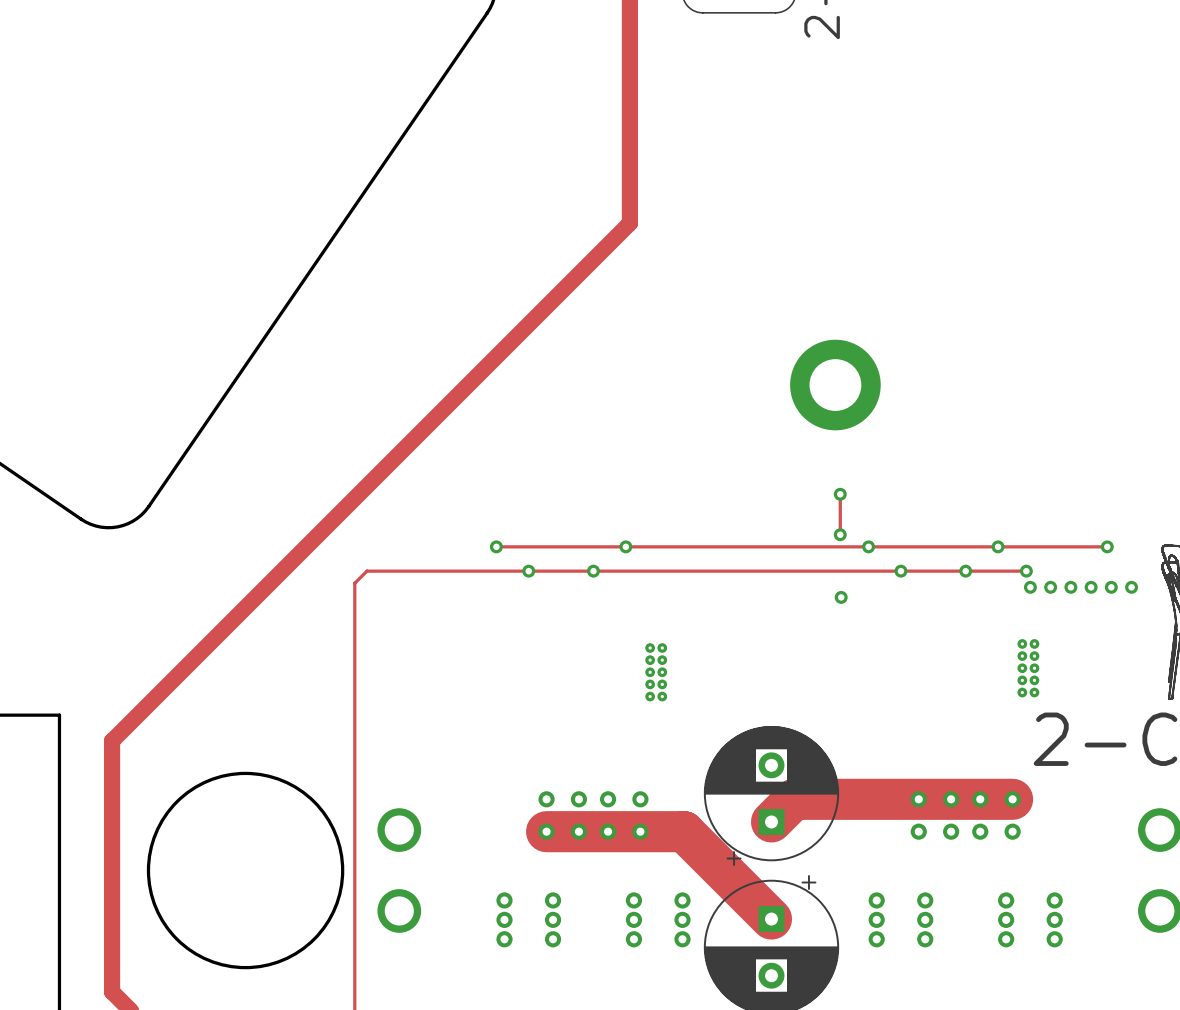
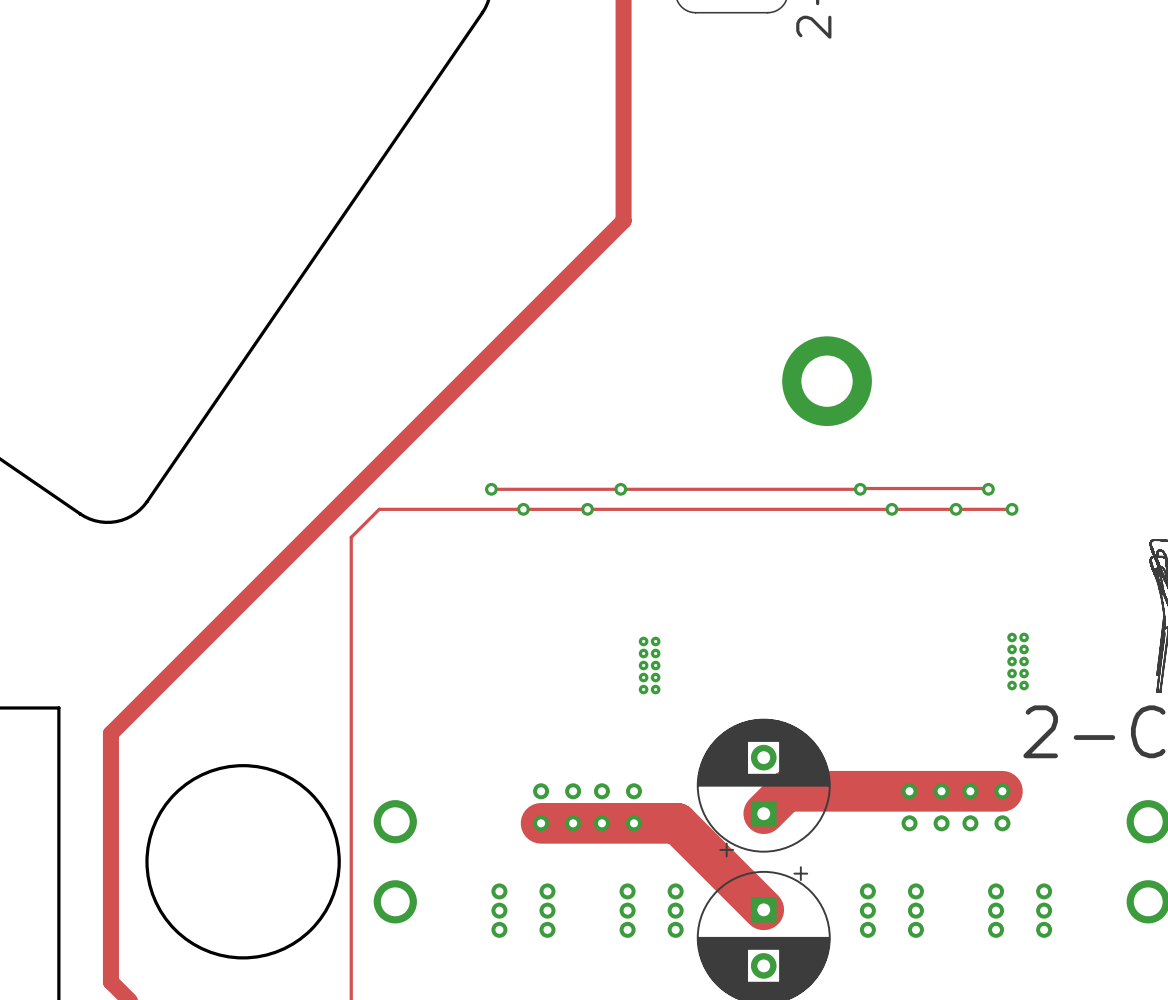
track: none -> (619, 487) (617, 489) (491, 489)
track: none -> (987, 488) (620, 489)
via: none -> (491, 489)
via: none -> (620, 489)
track: (840, 494) (840, 534) -> none
via: (840, 494) -> none
via: none -> (860, 489)
via: none -> (988, 489)
via: none -> (523, 509)
via: none -> (587, 509)
via: none -> (891, 509)
via: none -> (955, 509)
via: none -> (1012, 509)
via: (840, 534) -> none
track: (496, 546) (1107, 546) -> none
via: (496, 546) -> none
via: (625, 546) -> none
via: (868, 546) -> none
via: (998, 546) -> none
via: (1107, 546) -> none
via: (528, 571) -> none
via: (593, 571) -> none
via: (900, 571) -> none
via: (965, 571) -> none
track: (1026, 571) (366, 571) (354, 583) -> (1012, 509) (379, 509) (351, 537) (351, 577)
via: (1026, 571) -> none
via: (1030, 587) -> none
via: (1050, 587) -> none
via: (1070, 587) -> none
via: (1091, 587) -> none
via: (1111, 587) -> none
via: (1131, 587) -> none
via: (841, 597) -> none

